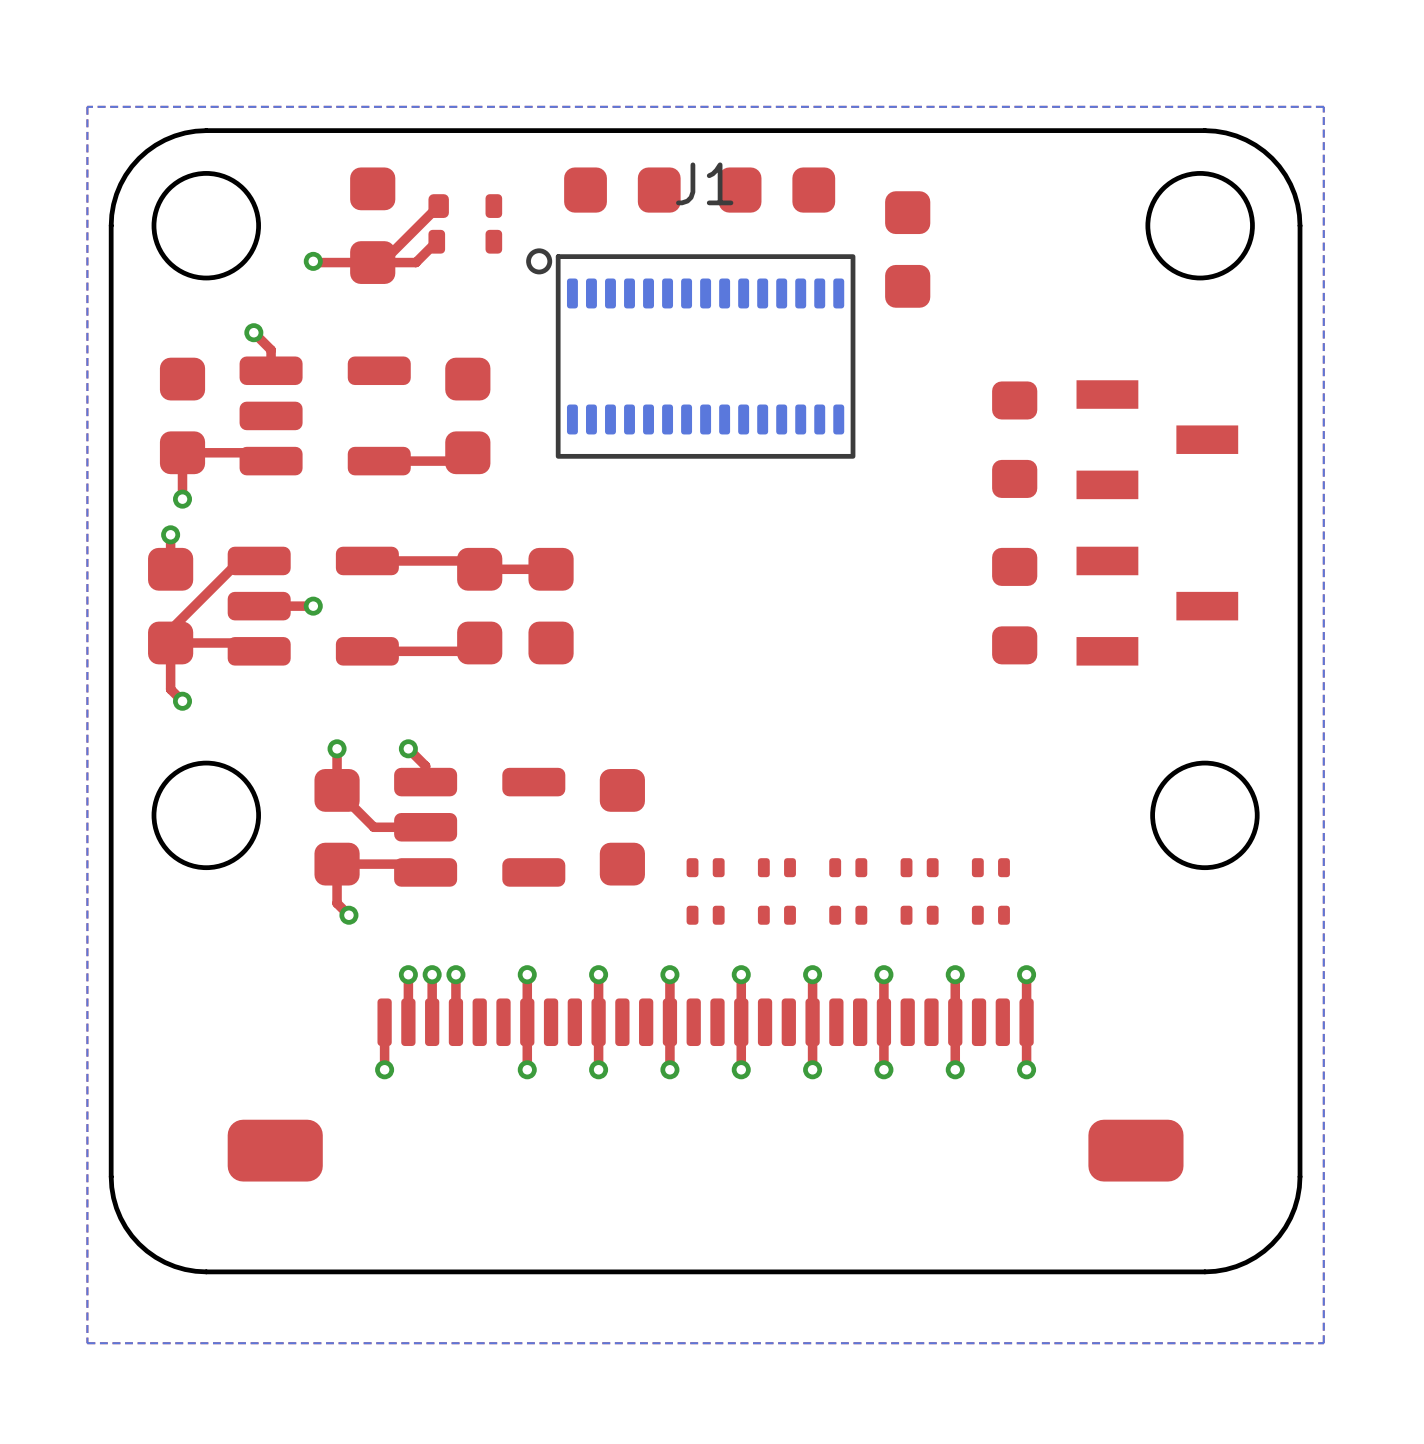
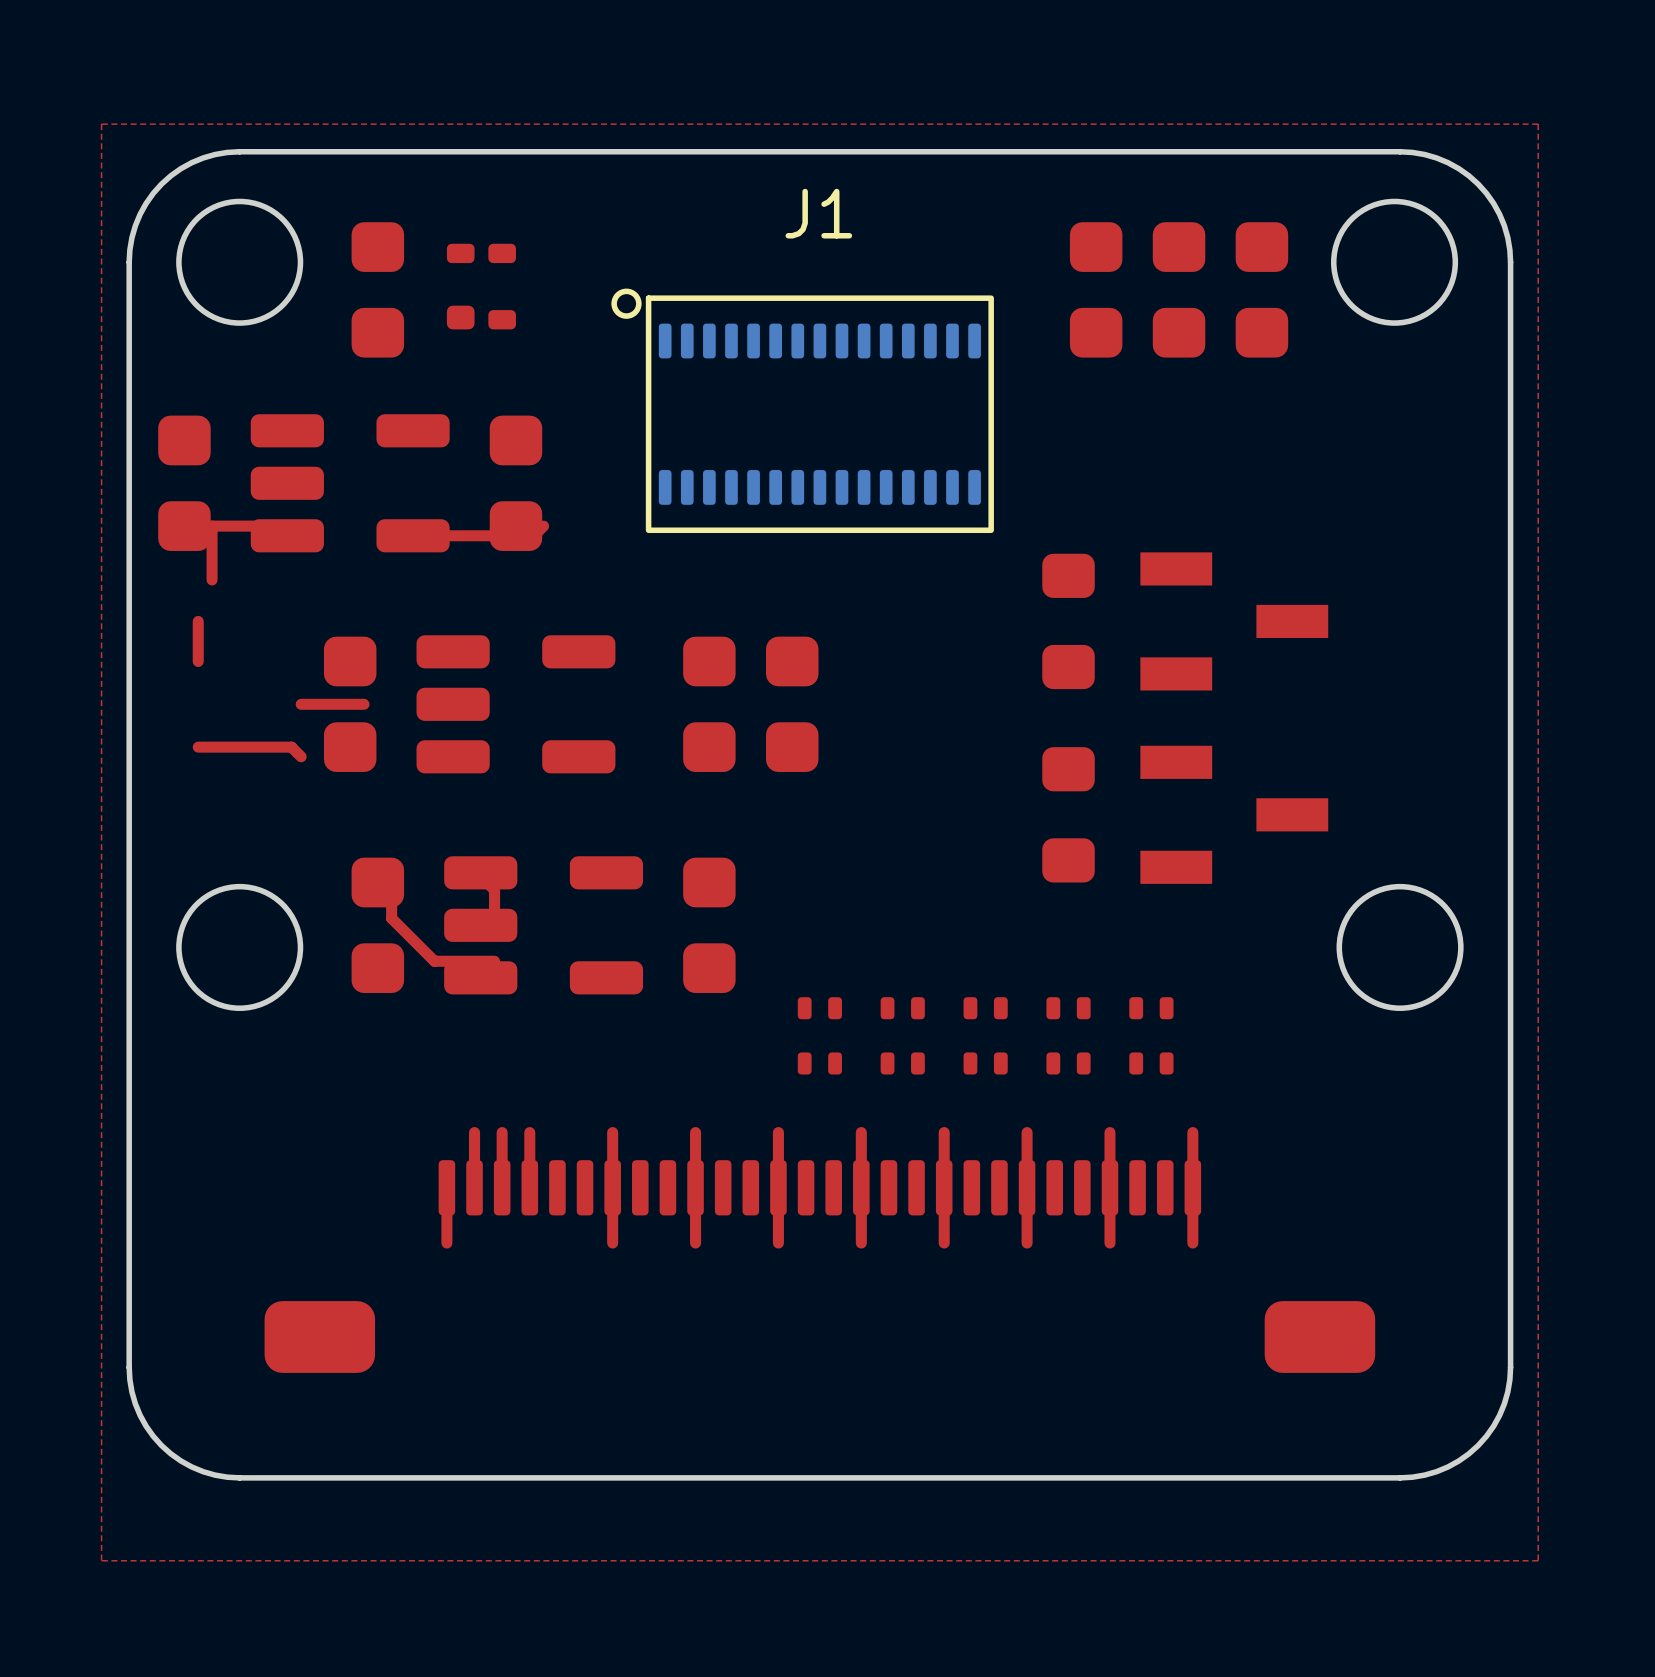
bottom zone outline: (1323, 106) (1323, 1343) (87, 1343) (87, 106) (1323, 106) -> none
part: (622, 190) -> none
part: (776, 190) -> none
top track: (438, 206) (382, 262) -> none
part rotation: 0° (465, 223) -> 90° counterclockwise (481, 286)
part position: (465, 223) -> (481, 286)
part position: (372, 225) -> (377, 289)
top track: (436, 241) (415, 262) (313, 261) -> none
part position: (907, 249) -> (1096, 289)
part: none -> (1179, 289)
part: none -> (1261, 289)
via: (313, 261) -> none
top track: (253, 332) (271, 349) (271, 370) -> none
via: (253, 332) -> none
part position: (182, 415) -> (184, 483)
part position: (325, 415) -> (350, 483)
part position: (467, 415) -> (515, 483)
part: (1014, 439) -> none
part: (1157, 439) -> none
via: (182, 499) -> none
via: (170, 534) -> none
part: none -> (1068, 621)
part: none -> (1234, 621)
part footprint: [227, 546, 399, 666] -> [323, 636, 377, 773]
part footprint: [457, 547, 503, 665] -> [416, 635, 616, 774]
top track: (259, 560) (239, 560) (170, 629) (170, 689) (182, 701) -> none
top track: (367, 560) (471, 560) (479, 569) (551, 569) -> none
part: (170, 606) -> none
via: (313, 606) -> none
part position: (551, 606) -> (709, 704)
part: none -> (792, 704)
part: (1014, 606) -> none
part: (1157, 606) -> none
top track: (479, 642) (471, 651) (367, 651) -> none
via: (182, 701) -> none
part: none -> (1068, 814)
part: none -> (1234, 814)
via: (337, 748) -> none
via: (408, 748) -> none
part position: (337, 827) -> (377, 925)
part position: (479, 827) -> (543, 925)
part position: (622, 827) -> (709, 925)
top track: (425, 872) (417, 864) (337, 864) (337, 903) (348, 915) -> none
via: (348, 915) -> none
via: (408, 974) -> none
via: (432, 974) -> none
via: (455, 974) -> none
via: (527, 974) -> none
via: (598, 974) -> none
via: (669, 974) -> none
via: (741, 974) -> none
via: (812, 974) -> none
via: (883, 974) -> none
via: (955, 974) -> none
via: (1026, 974) -> none
via: (384, 1069) -> none
via: (527, 1069) -> none
via: (598, 1069) -> none
via: (669, 1069) -> none
via: (741, 1069) -> none
via: (812, 1069) -> none
via: (883, 1069) -> none
via: (955, 1069) -> none
via: (1026, 1069) -> none

